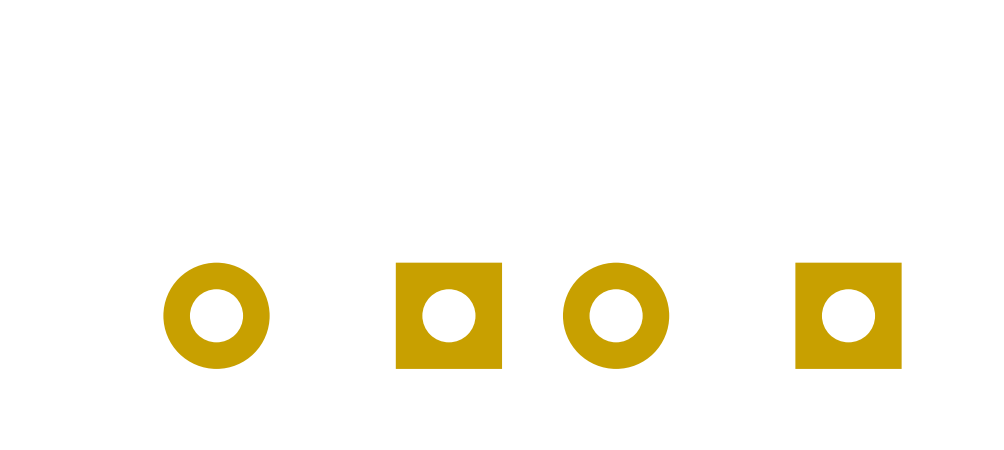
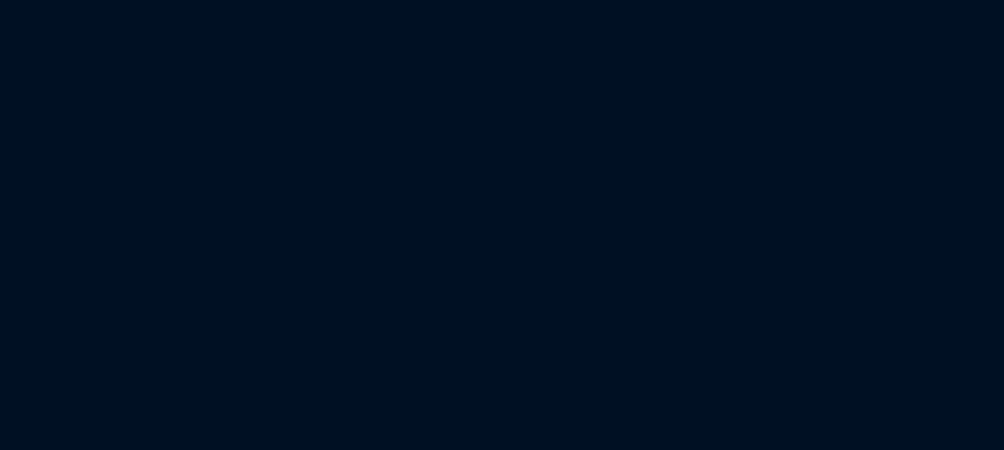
part: (332, 315) -> none
part: (732, 315) -> none

